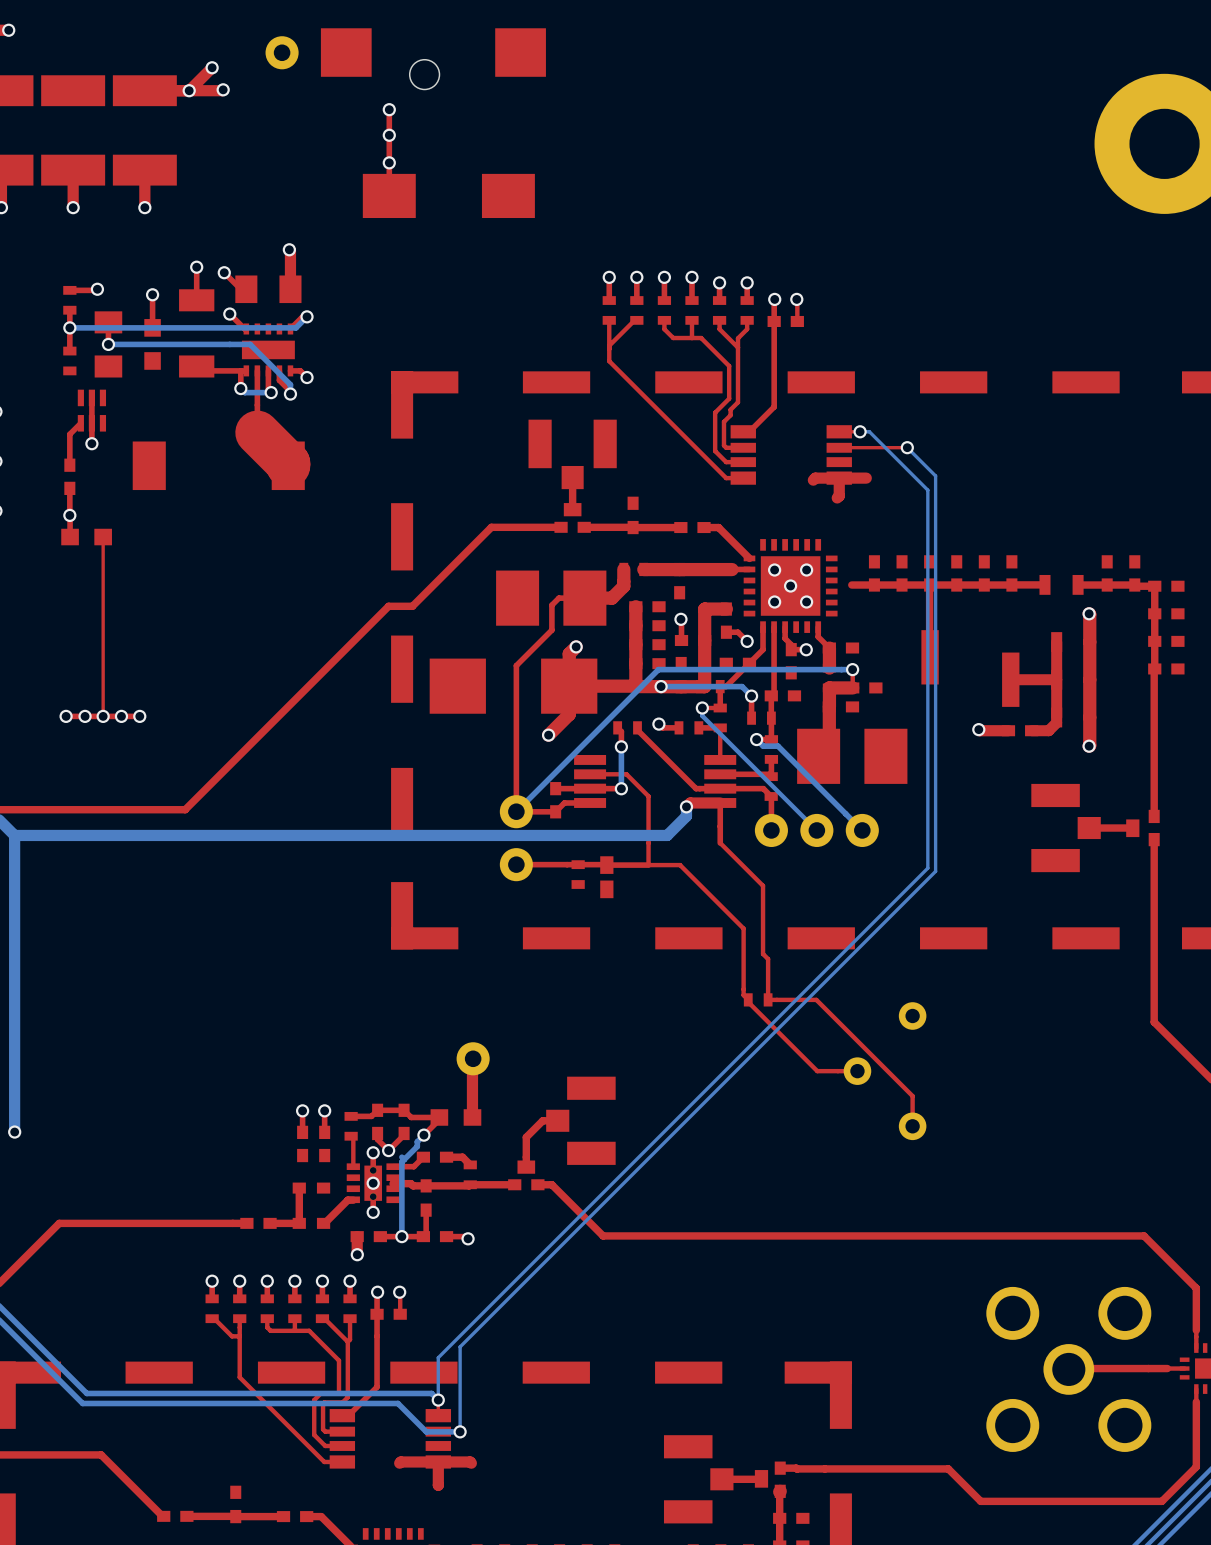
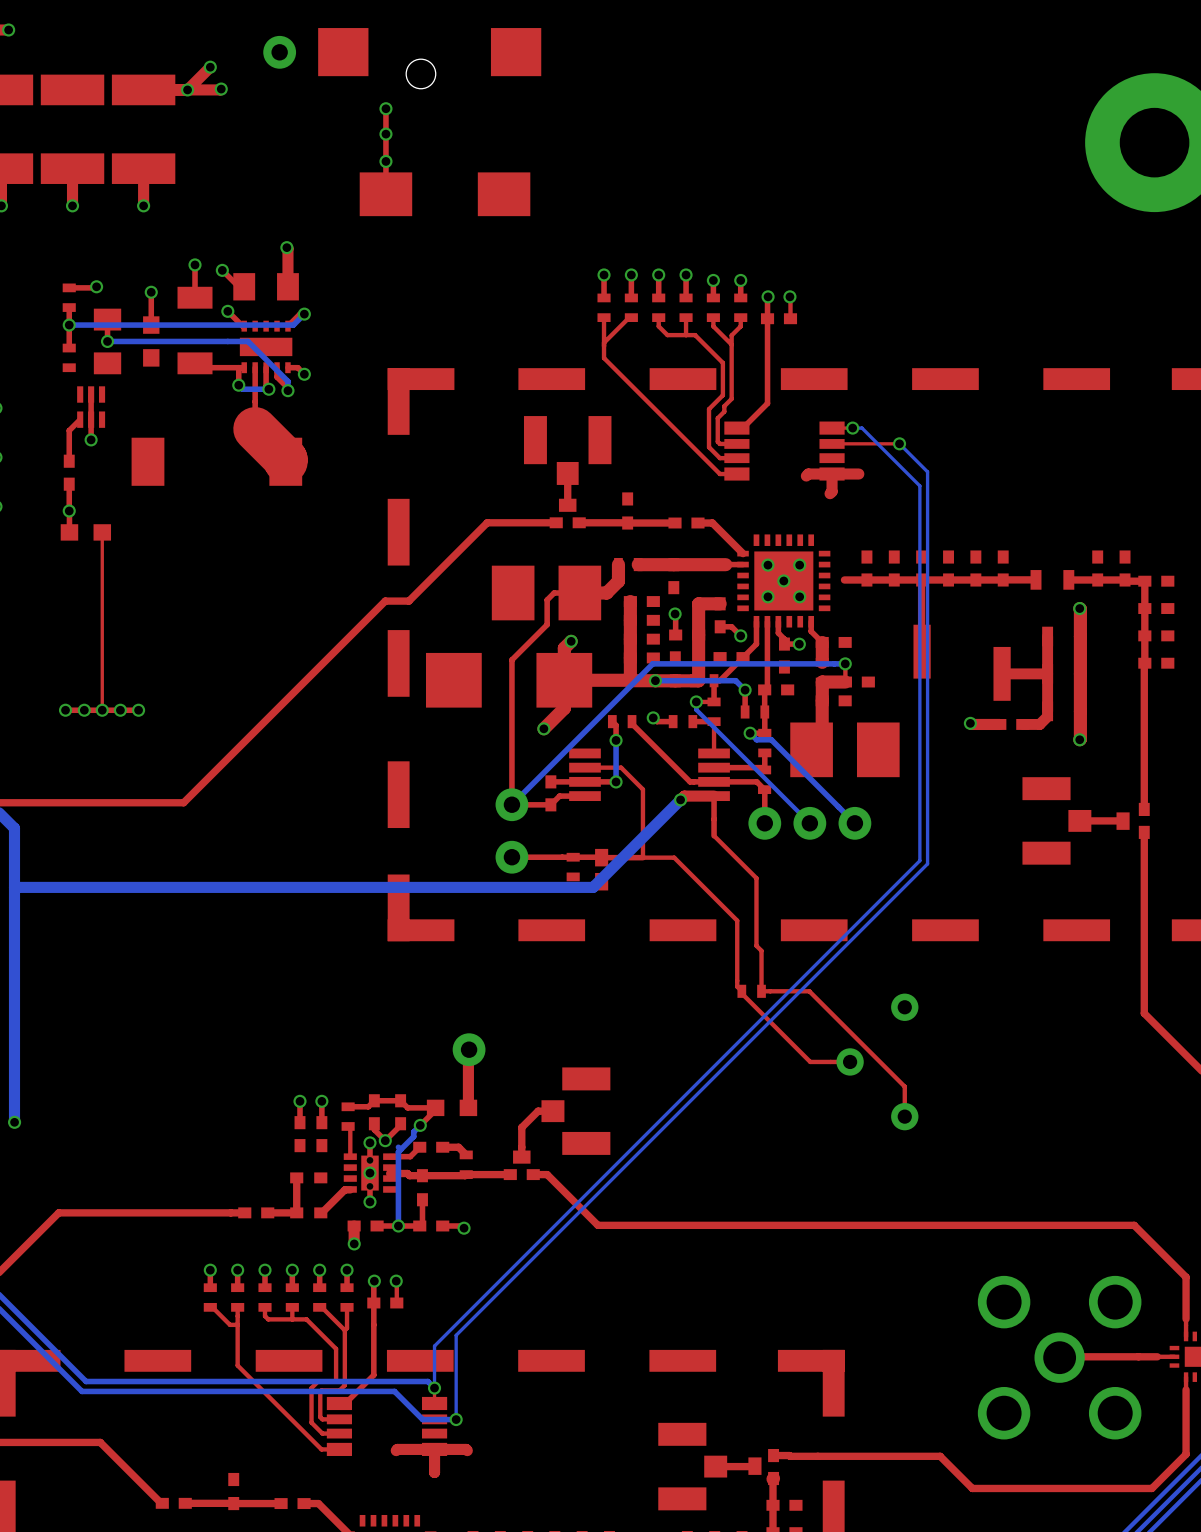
bottom track: (686, 806) (686, 816) (667, 835) (14, 835) -> (680, 799) (593, 887) (14, 887)

